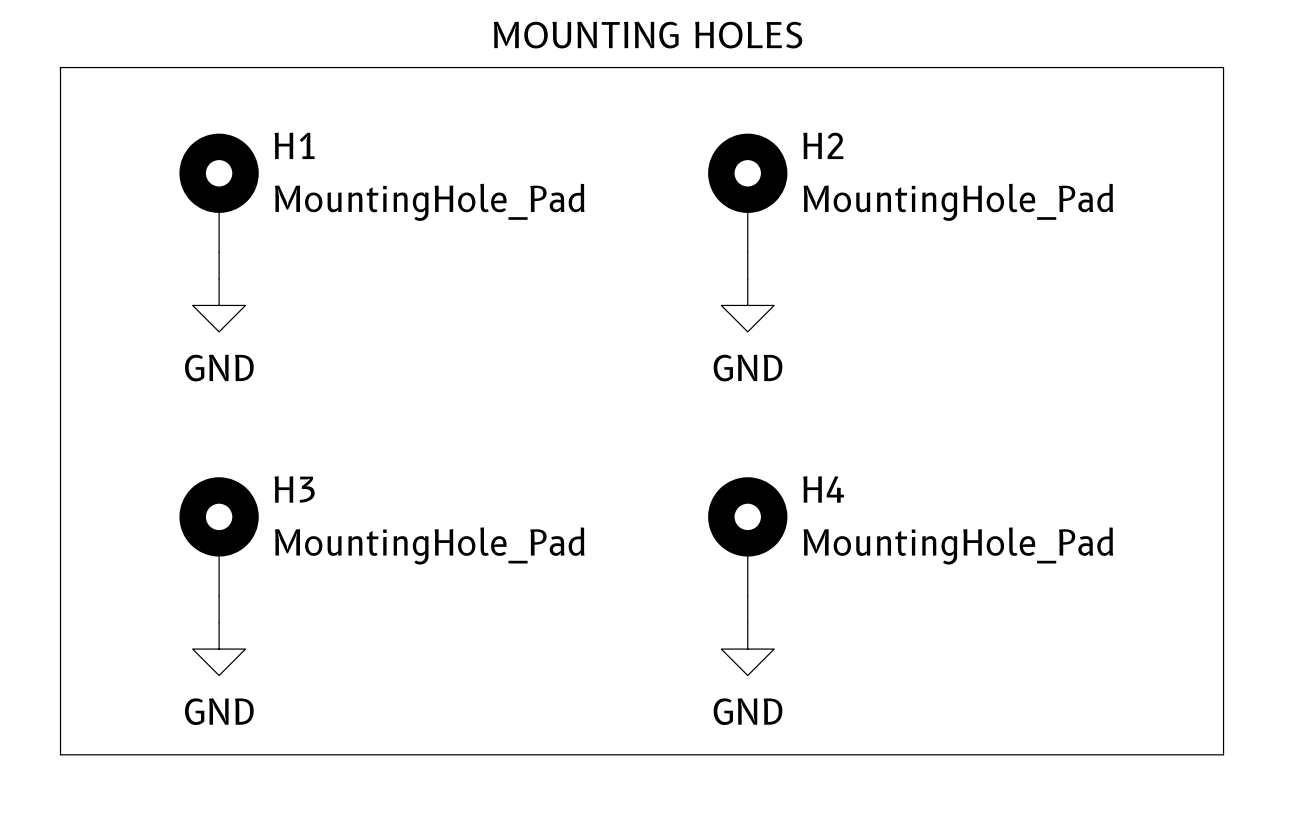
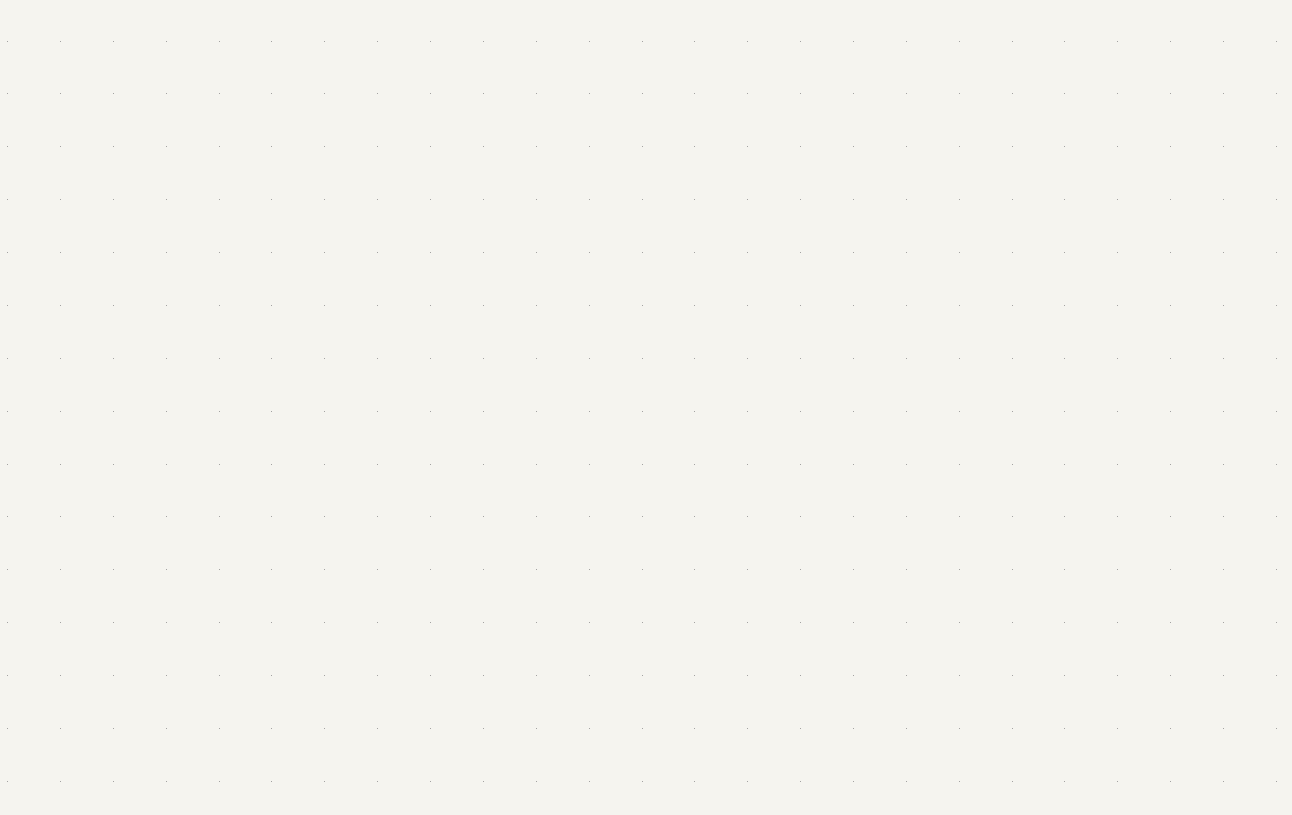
text: MOUNTING HOLES (648, 35) -> none
line: (60, 67) (1223, 67) (1223, 754) (60, 754) (60, 67) -> none
H1: MountingHole_Pad (219, 193) -> none
H2: MountingHole_Pad (747, 193) -> none
wire: (219, 252) (219, 279) -> none
wire: (747, 252) (747, 279) -> none
power symbol: GND (219, 305) -> none
power symbol: GND (747, 305) -> none
H3: MountingHole_Pad (219, 536) -> none
H4: MountingHole_Pad (747, 536) -> none
wire: (219, 596) (219, 622) -> none
wire: (747, 596) (747, 622) -> none
power symbol: GND (219, 649) -> none
power symbol: GND (747, 649) -> none

